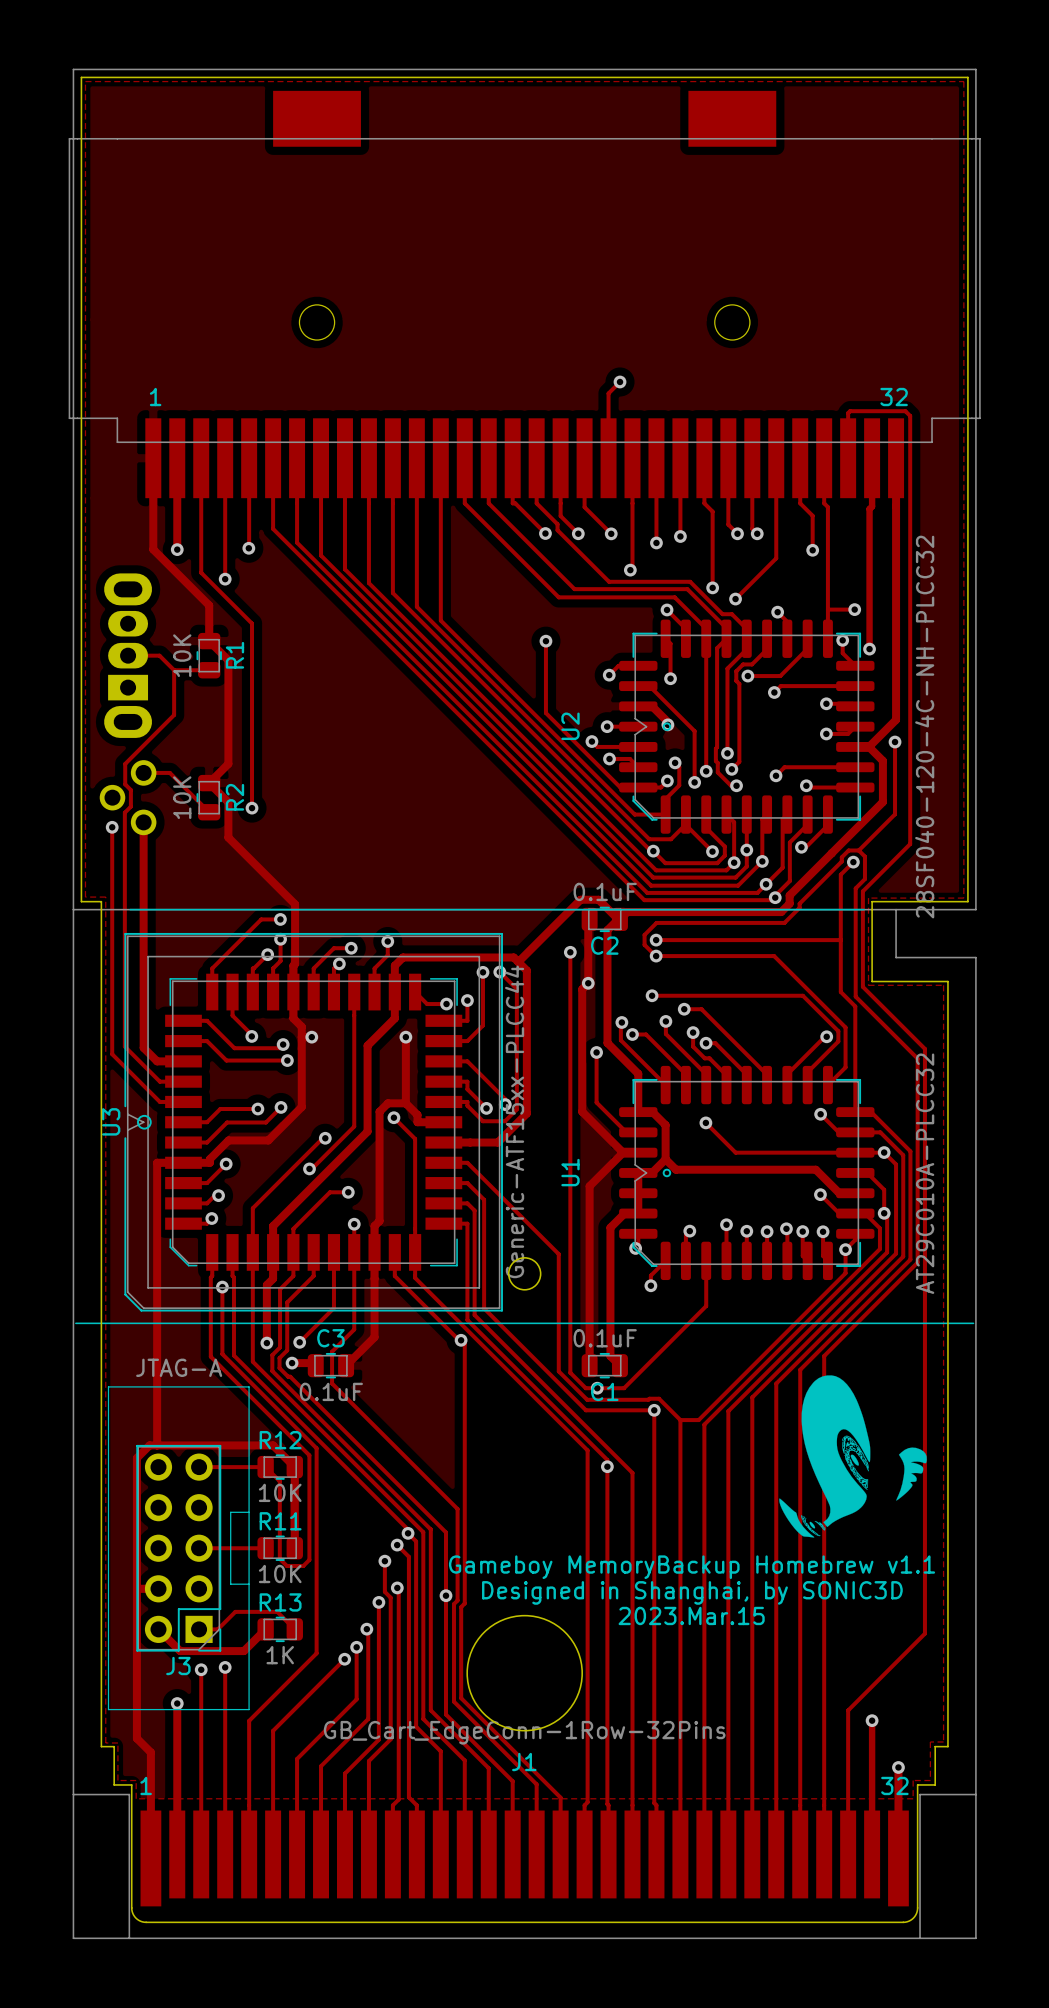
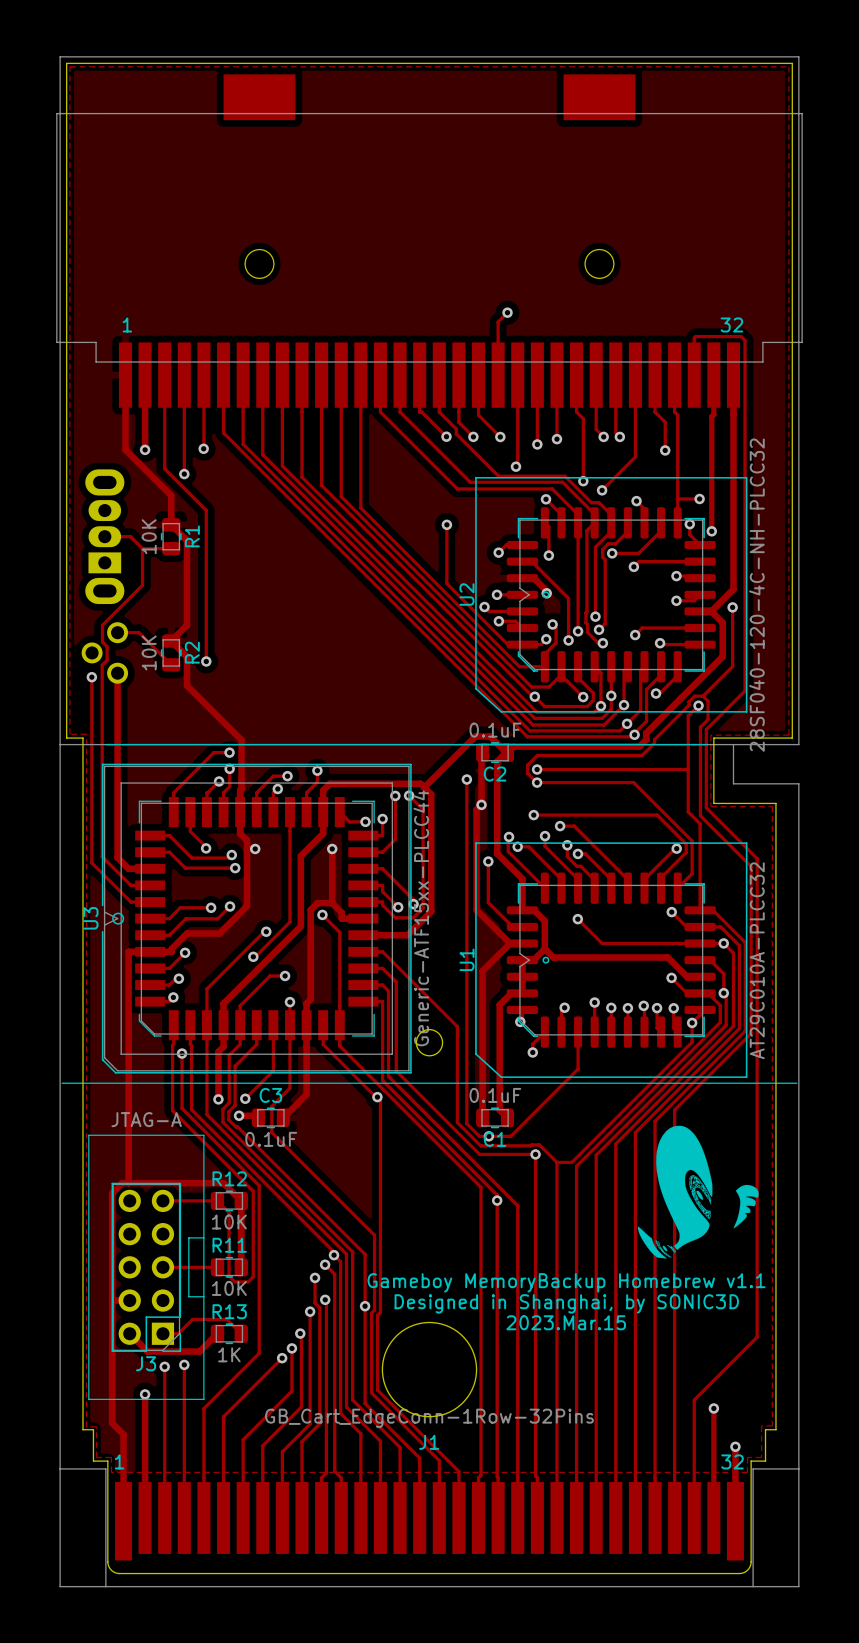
U2 footprint: [619, 619, 875, 834] -> [475, 477, 748, 713]
U1 footprint: [619, 1065, 875, 1281] -> [475, 842, 748, 1078]

